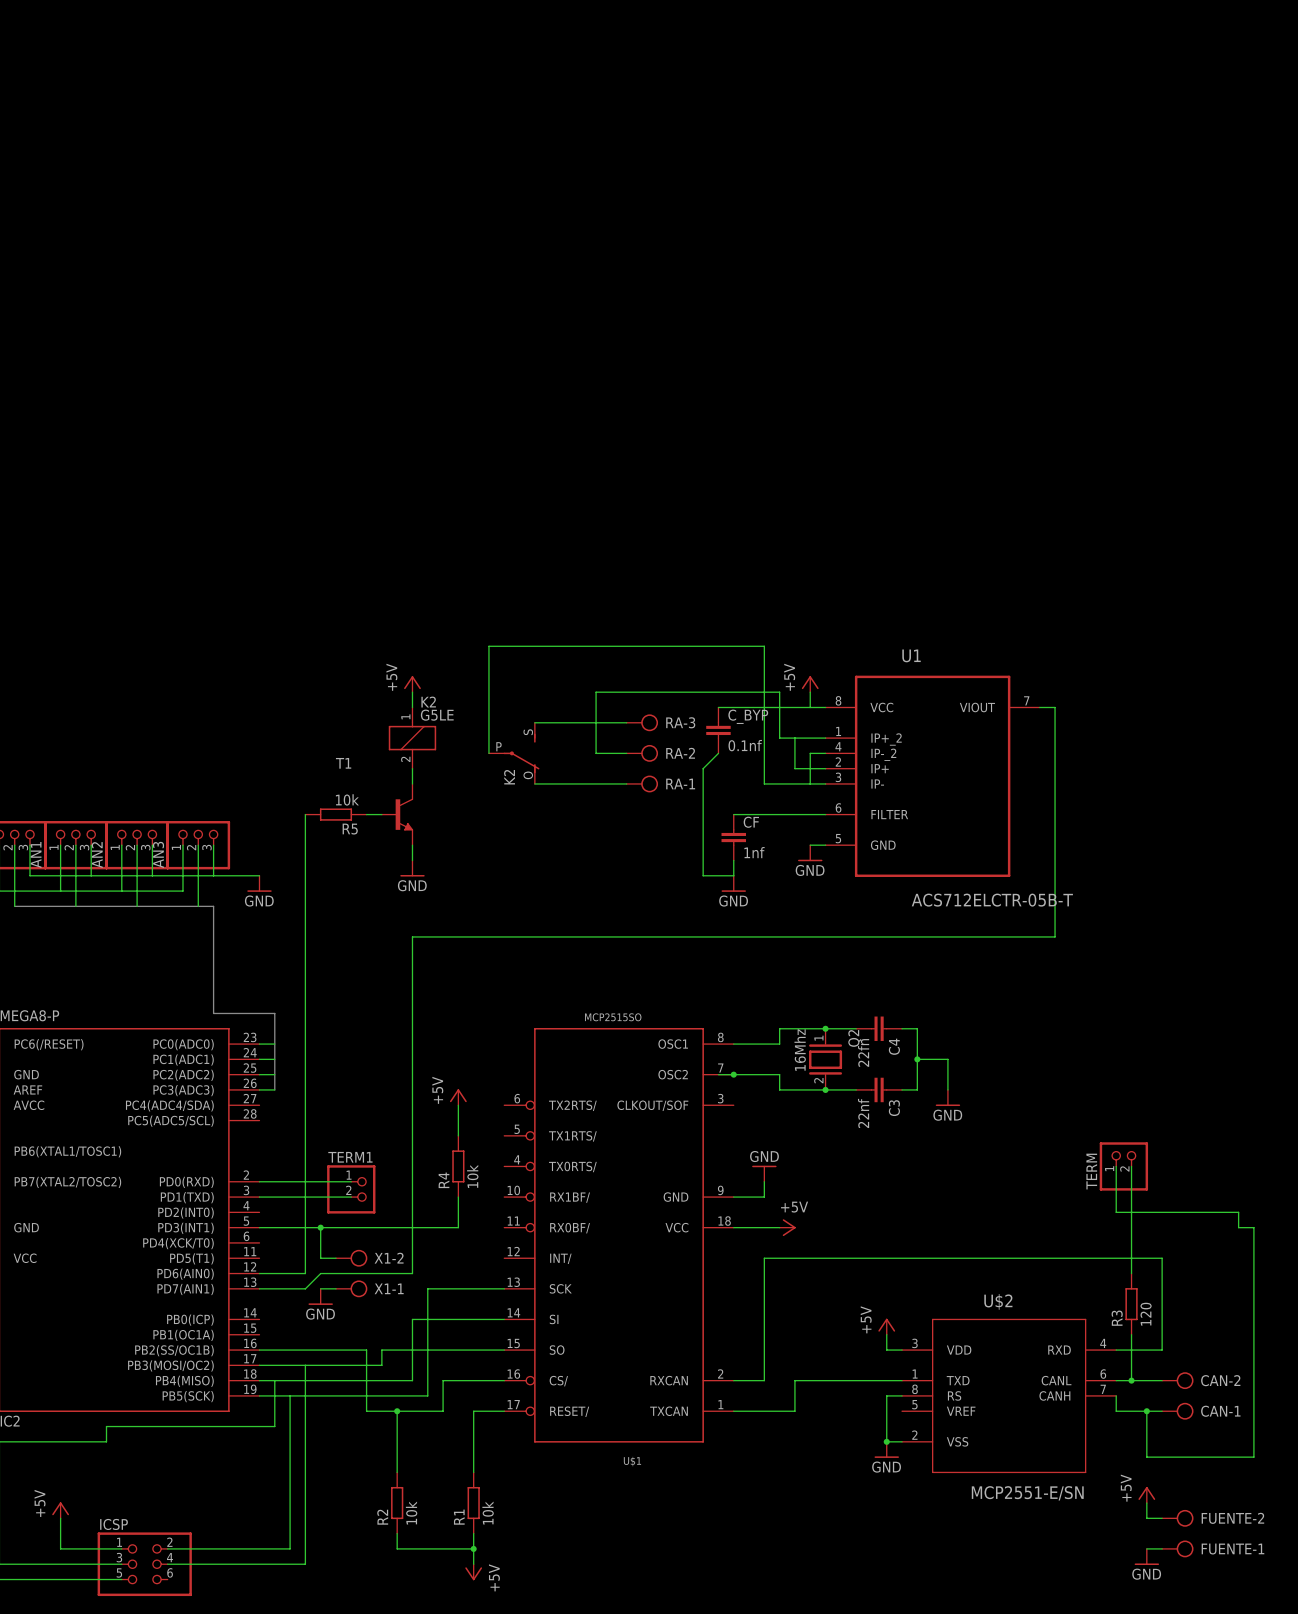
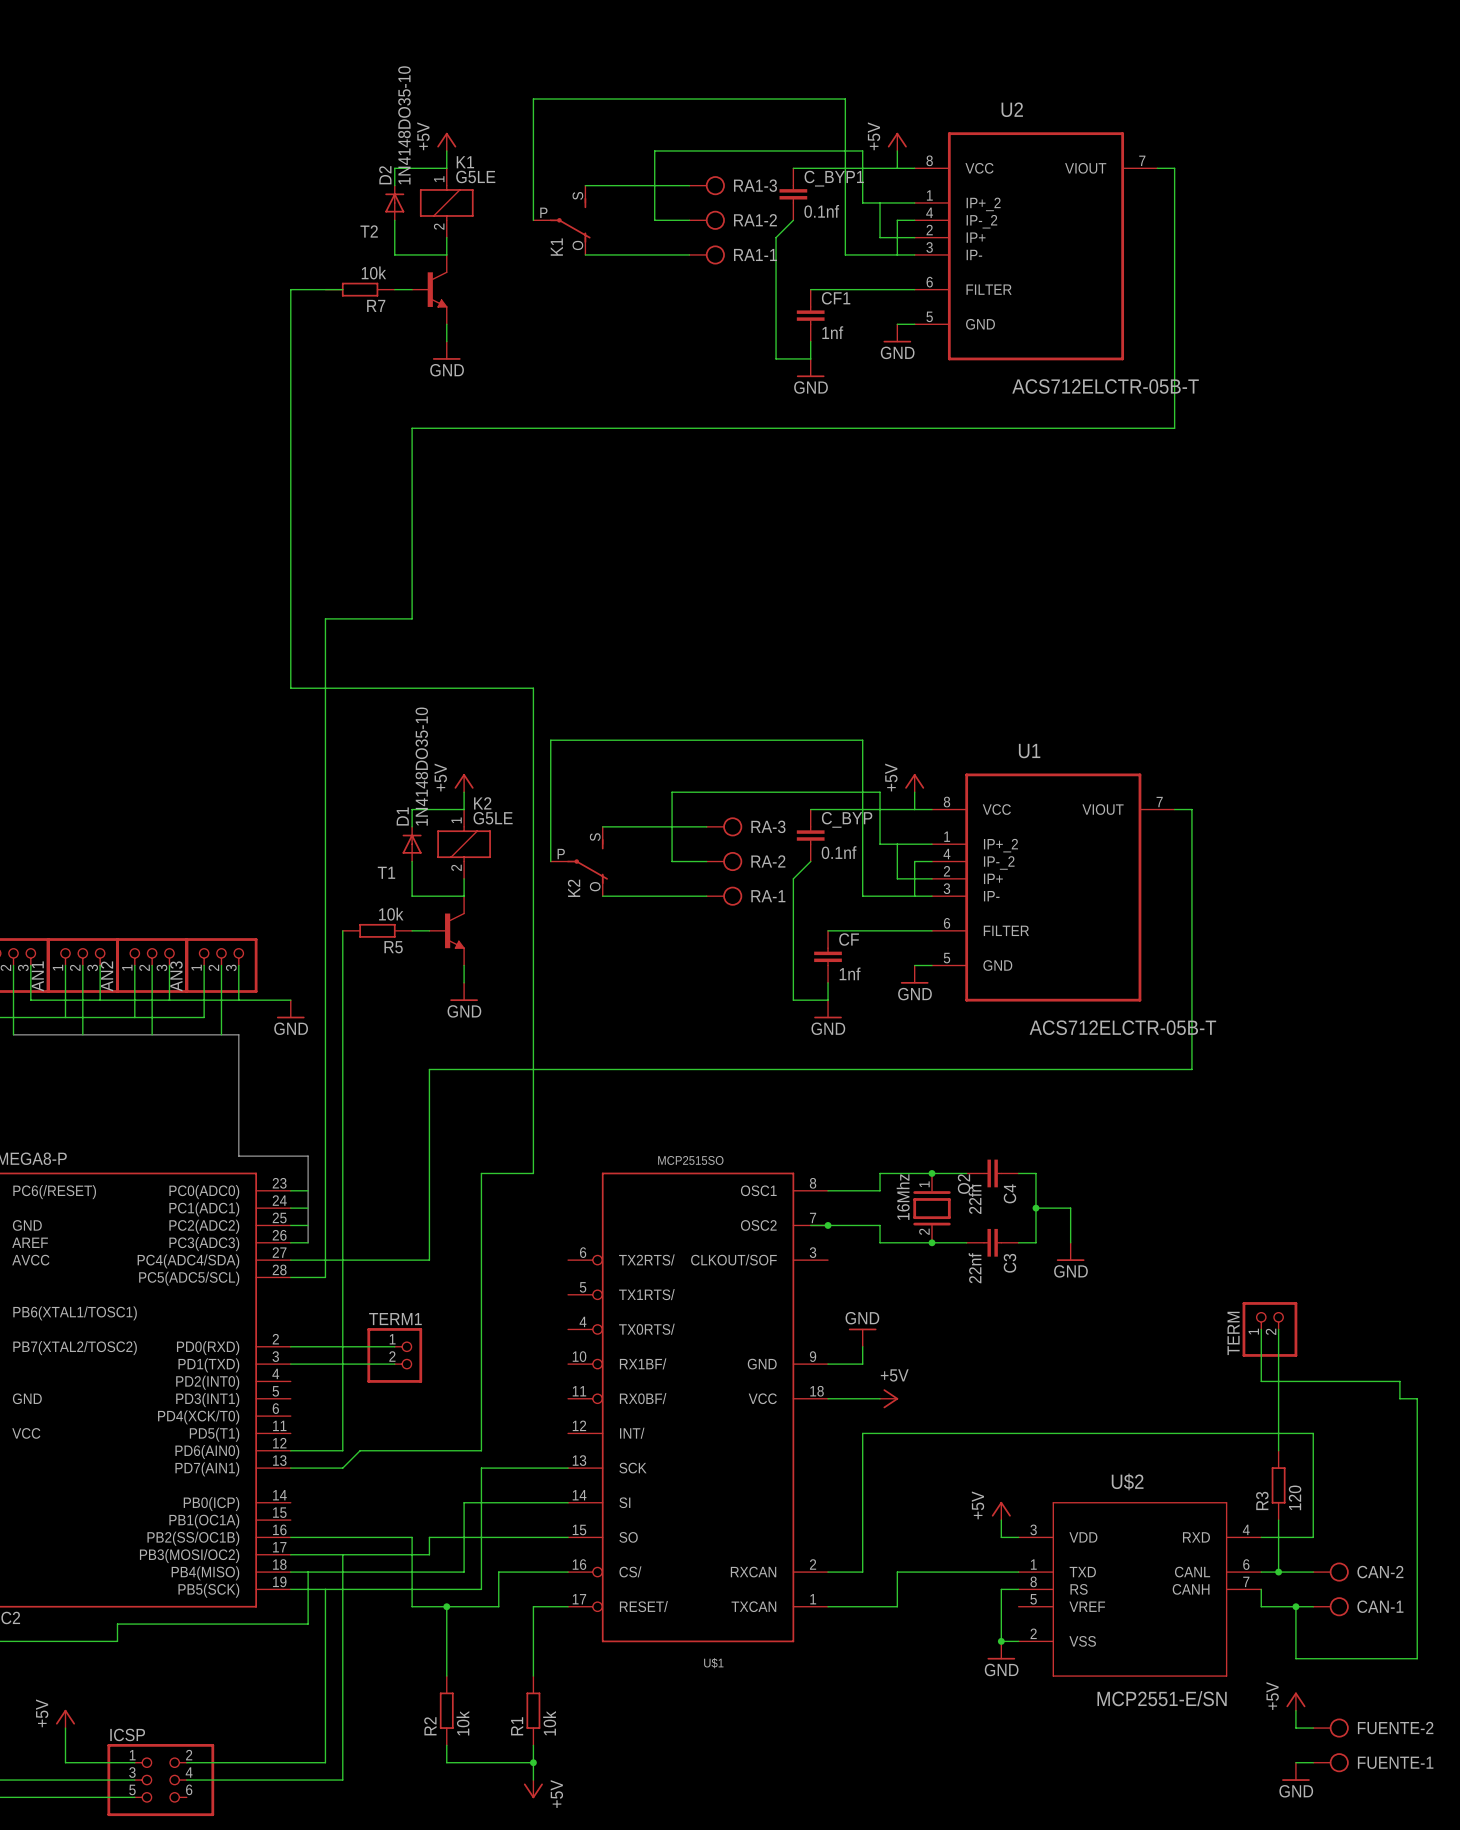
power symbol: none -> +5V (446, 141)
power symbol: none -> +5V (897, 141)
wire: none -> (446, 150) (446, 168) (394, 168) (394, 185)
wire: none -> (897, 150) (897, 168)
wire: none -> (793, 168) (914, 168)
wire: none -> (1157, 168) (1174, 168) (1174, 428) (412, 428) (412, 618) (325, 618) (325, 1277) (290, 1277)
wire: none -> (585, 185) (689, 185)
RA1-3: none -> (707, 185)
C_BYP1: none -> 0.1nf (793, 194)
D2: none -> 1N4148DO35-10 (394, 202)
K1: none -> G5LE (446, 202)
wire: none -> (880, 202) (880, 237) (914, 237)
wire: none -> (914, 202) (862, 202) (862, 150) (654, 150) (654, 220) (689, 220)
wire: none -> (394, 220) (394, 254) (446, 254) (446, 237)
wire: none -> (533, 220) (533, 99) (845, 99) (845, 254) (914, 254)
K1: none -> (562, 220)
RA1-2: none -> (707, 220)
wire: none -> (793, 220) (776, 237) (776, 358) (810, 358) (810, 341)
wire: none -> (914, 220) (897, 220) (897, 254)
U2: none -> ACS712ELCTR-05B-T (1035, 246)
wire: none -> (585, 254) (689, 254)
RA1-1: none -> (707, 254)
wire: none -> (342, 289) (290, 289) (290, 688) (533, 688) (533, 1173) (481, 1173) (481, 1450) (464, 1450)
R7: none -> 10k (360, 289)
wire: none -> (394, 289) (412, 289)
T2: none -> (429, 289)
wire: none -> (810, 289) (914, 289)
CF1: none -> 1nf (810, 315)
wire: none -> (446, 324) (446, 341)
wire: none -> (897, 324) (914, 324)
power symbol: none -> GND (897, 333)
power symbol: none -> GND (446, 350)
power symbol: none -> GND (810, 368)
wire: none -> (464, 809) (412, 809) (412, 826)
D1: none -> 1N4148DO35-10 (412, 844)
wire: none -> (412, 861) (412, 896) (464, 896)
wire: (412, 936) (412, 1273) -> (464, 1069) (429, 1069) (429, 1260) (290, 1260)
power symbol: +5V (458, 1097) -> none
wire: (458, 1105) (458, 1135) -> none
R4: 10k (458, 1166) -> none
wire: (458, 1197) (458, 1227) (259, 1227) -> none
wire: (320, 1227) (320, 1258) (335, 1258) -> none
junction: (320, 1227) -> none
X1-2: (351, 1258) -> none
wire: (320, 1288) (335, 1288) -> none
X1-1: (351, 1288) -> none
power symbol: GND (320, 1296) -> none

